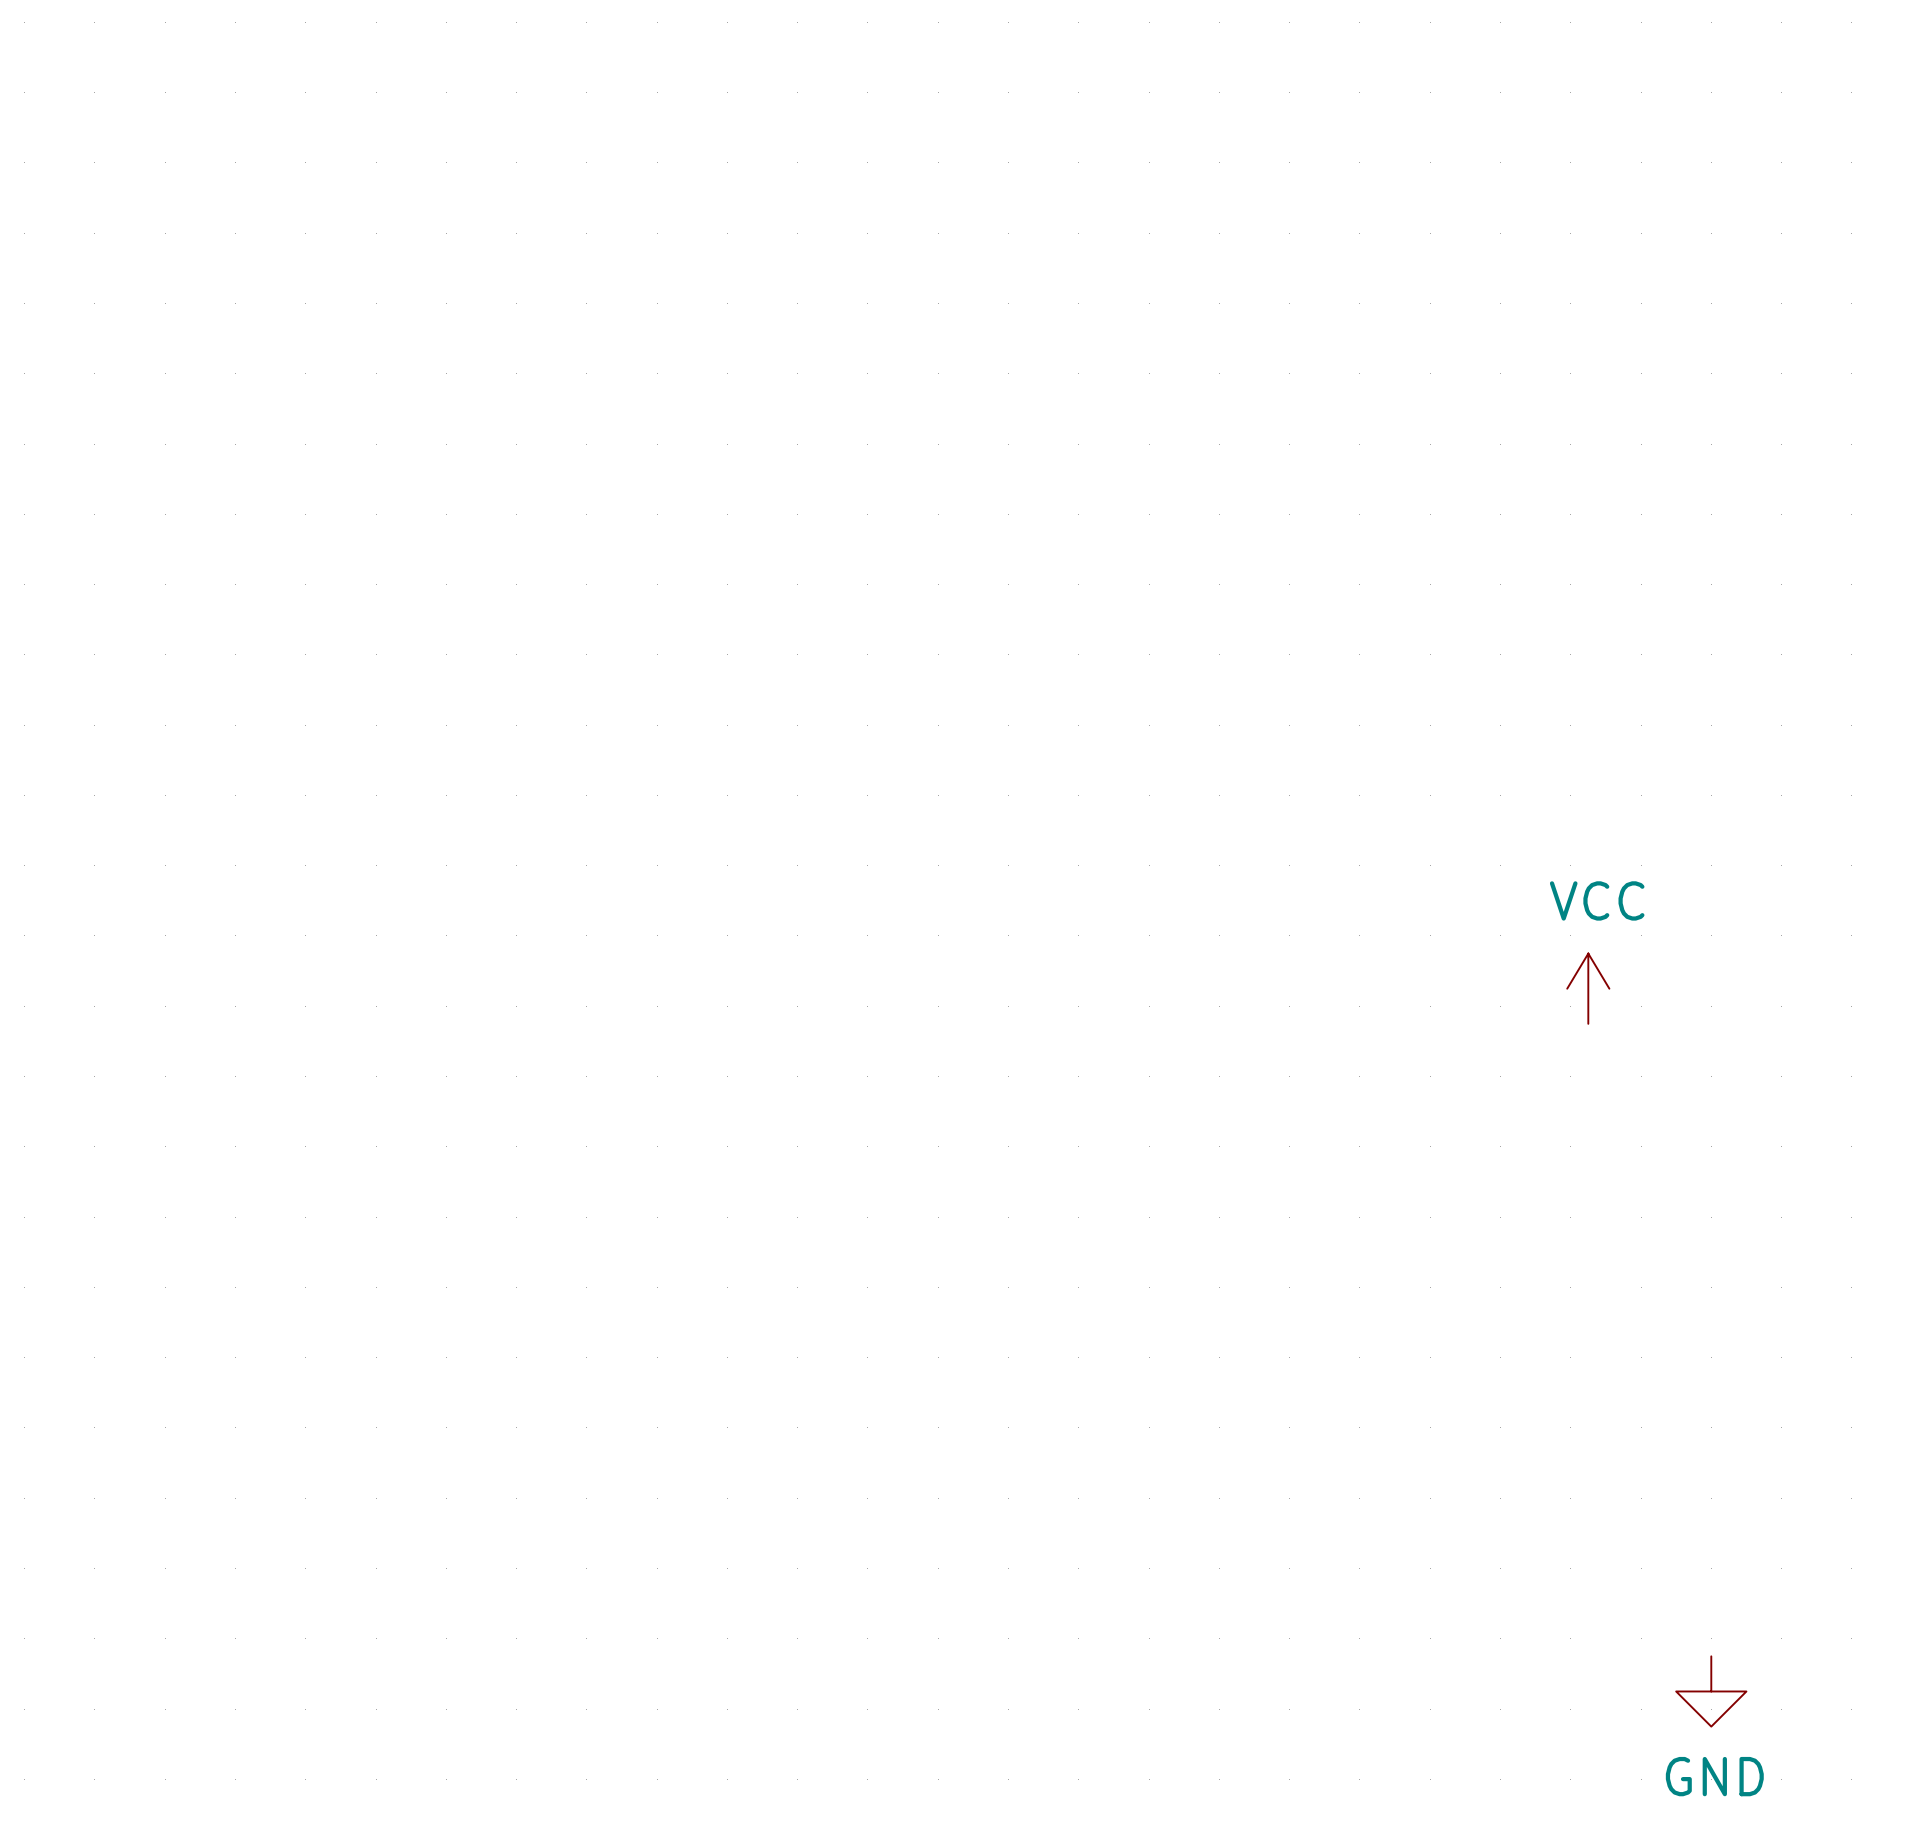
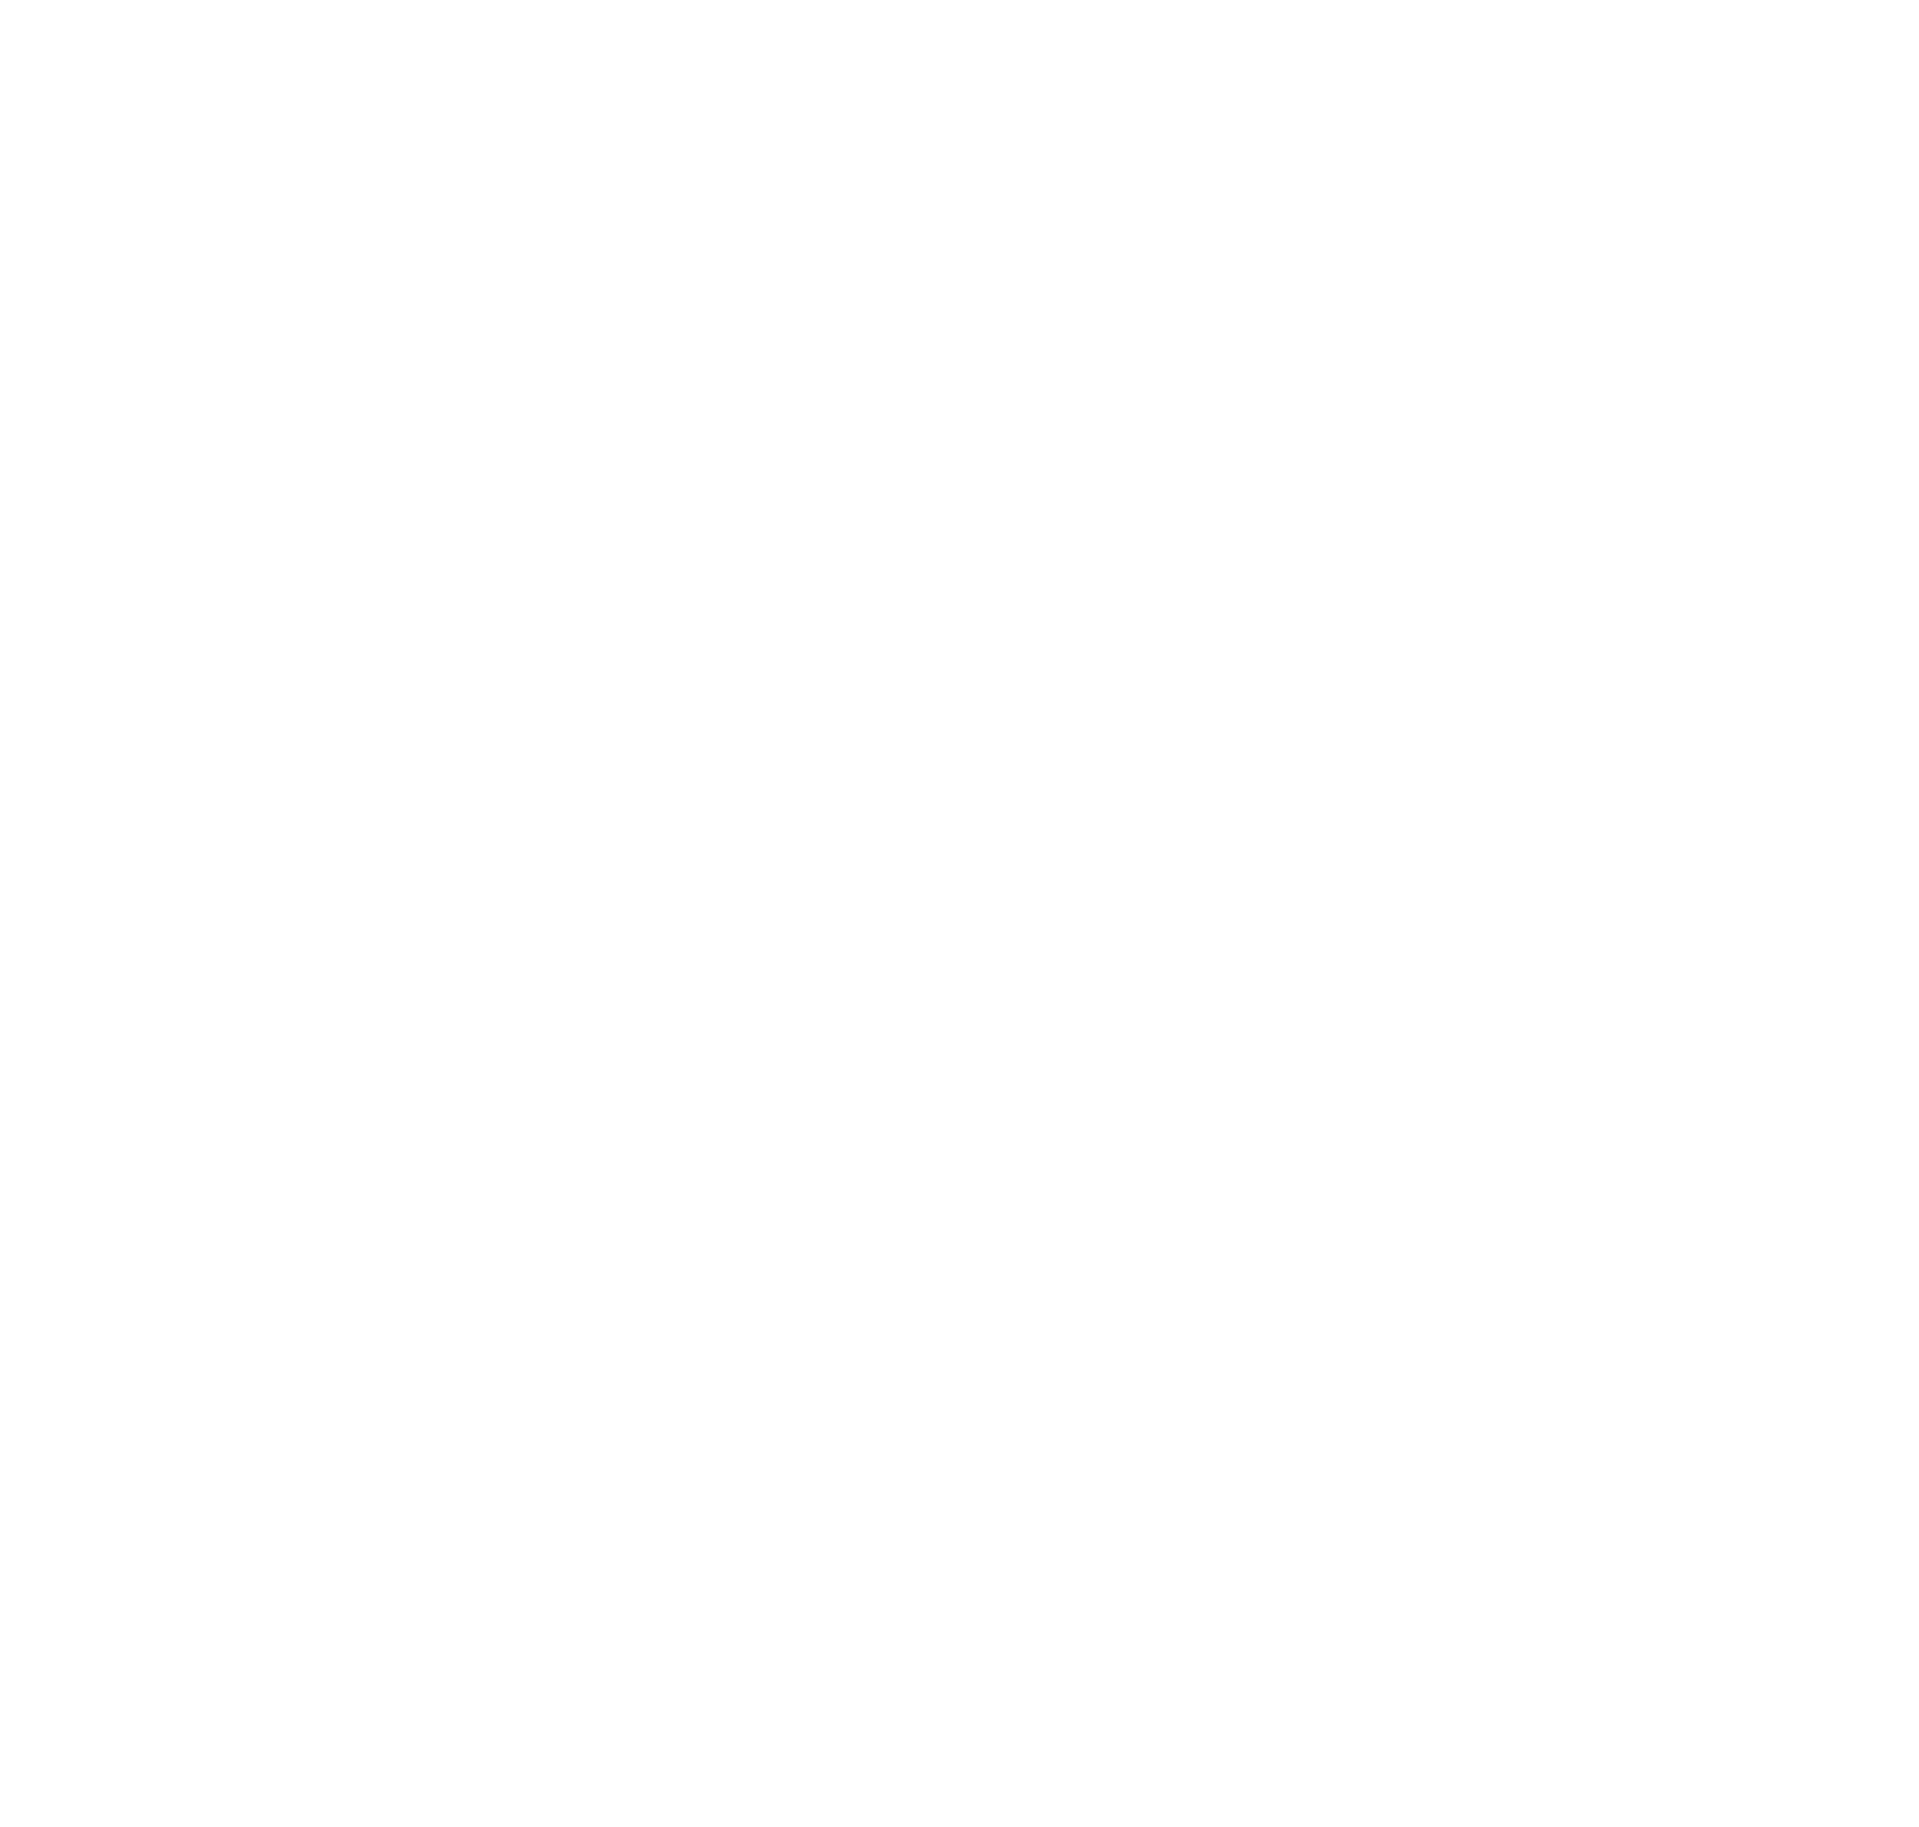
power symbol: VCC (1588, 988) -> none
power symbol: GND (1711, 1691) -> none

